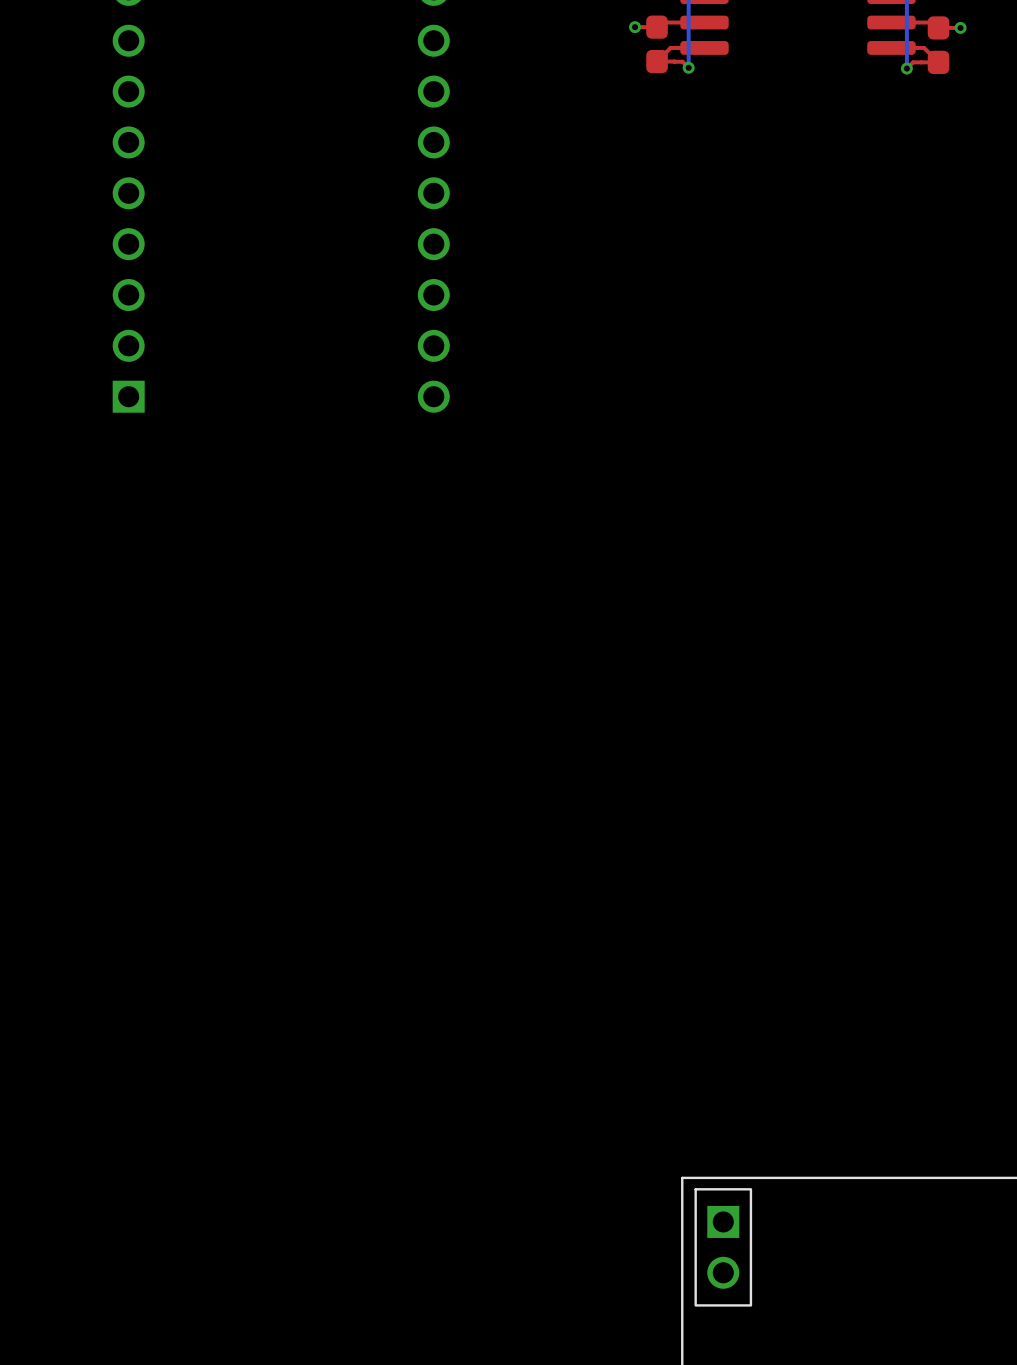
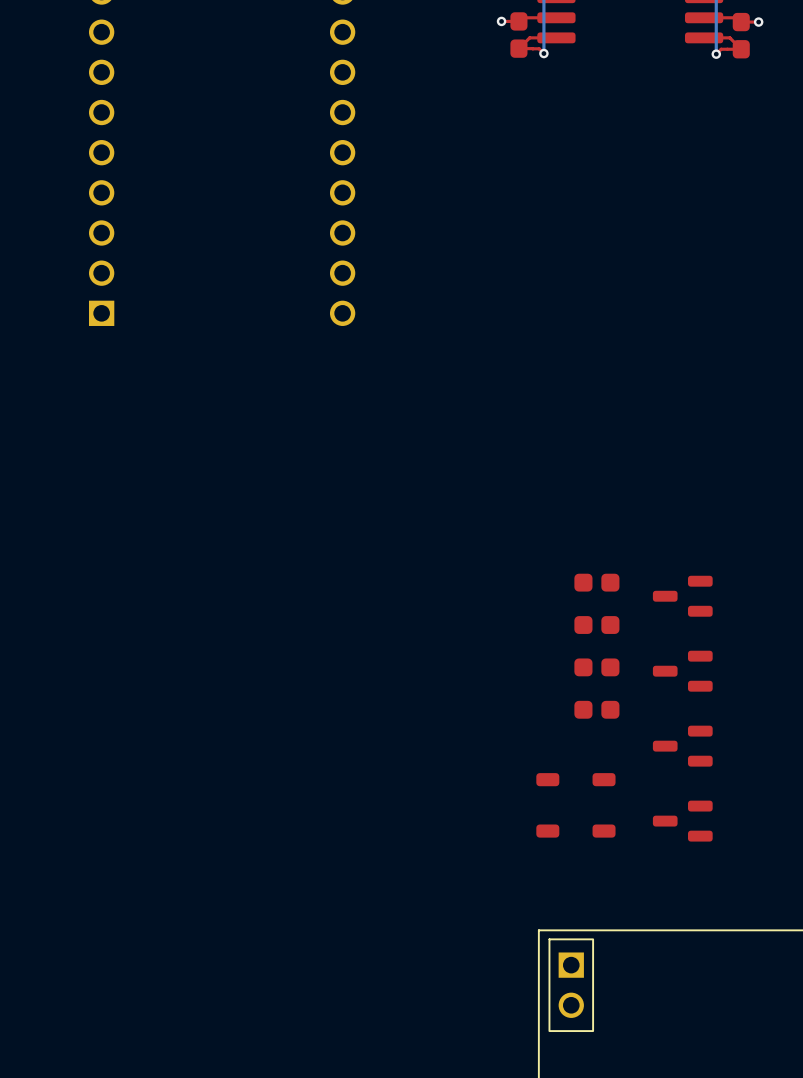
part: none -> (596, 582)
part: none -> (682, 596)
part: none -> (596, 625)
part: none -> (596, 667)
part: none -> (682, 671)
part: none -> (596, 709)
part: none -> (682, 746)
part: none -> (575, 779)
part: none -> (682, 821)
part: none -> (575, 831)

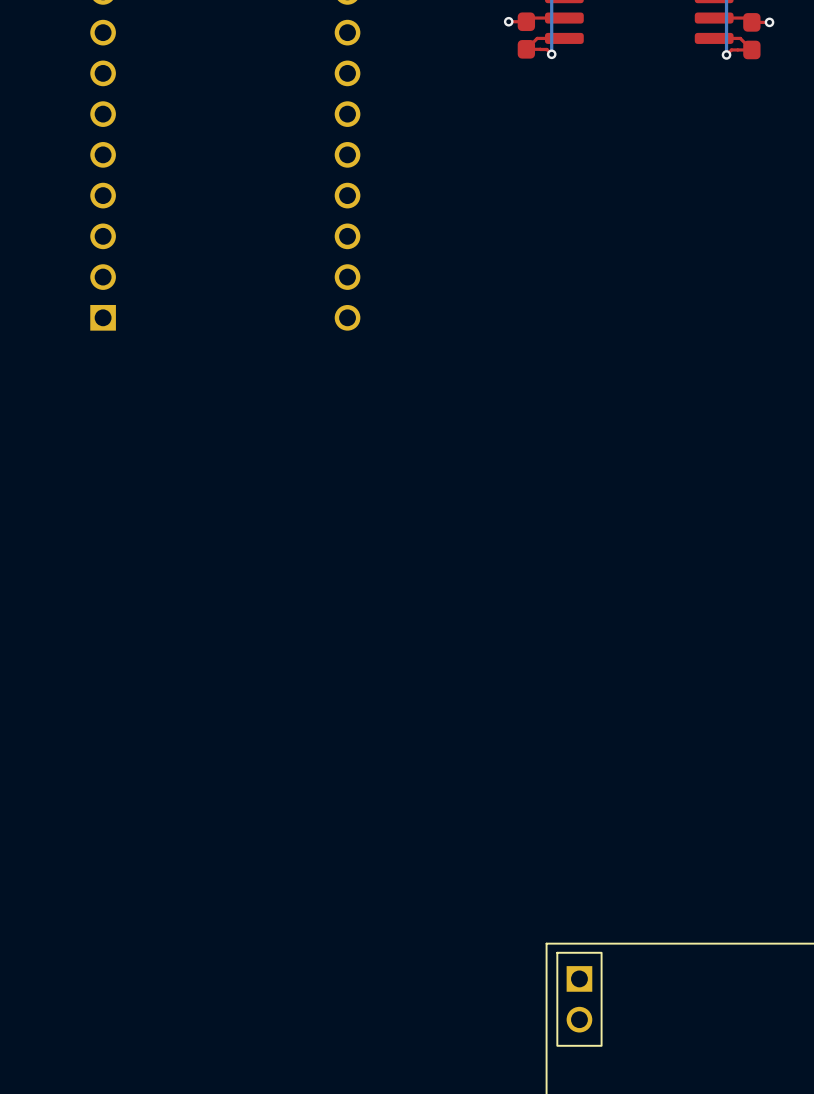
part: (596, 582) -> none
part: (682, 596) -> none
part: (596, 625) -> none
part: (596, 667) -> none
part: (682, 671) -> none
part: (596, 709) -> none
part: (682, 746) -> none
part: (575, 779) -> none
part: (682, 821) -> none
part: (575, 831) -> none

